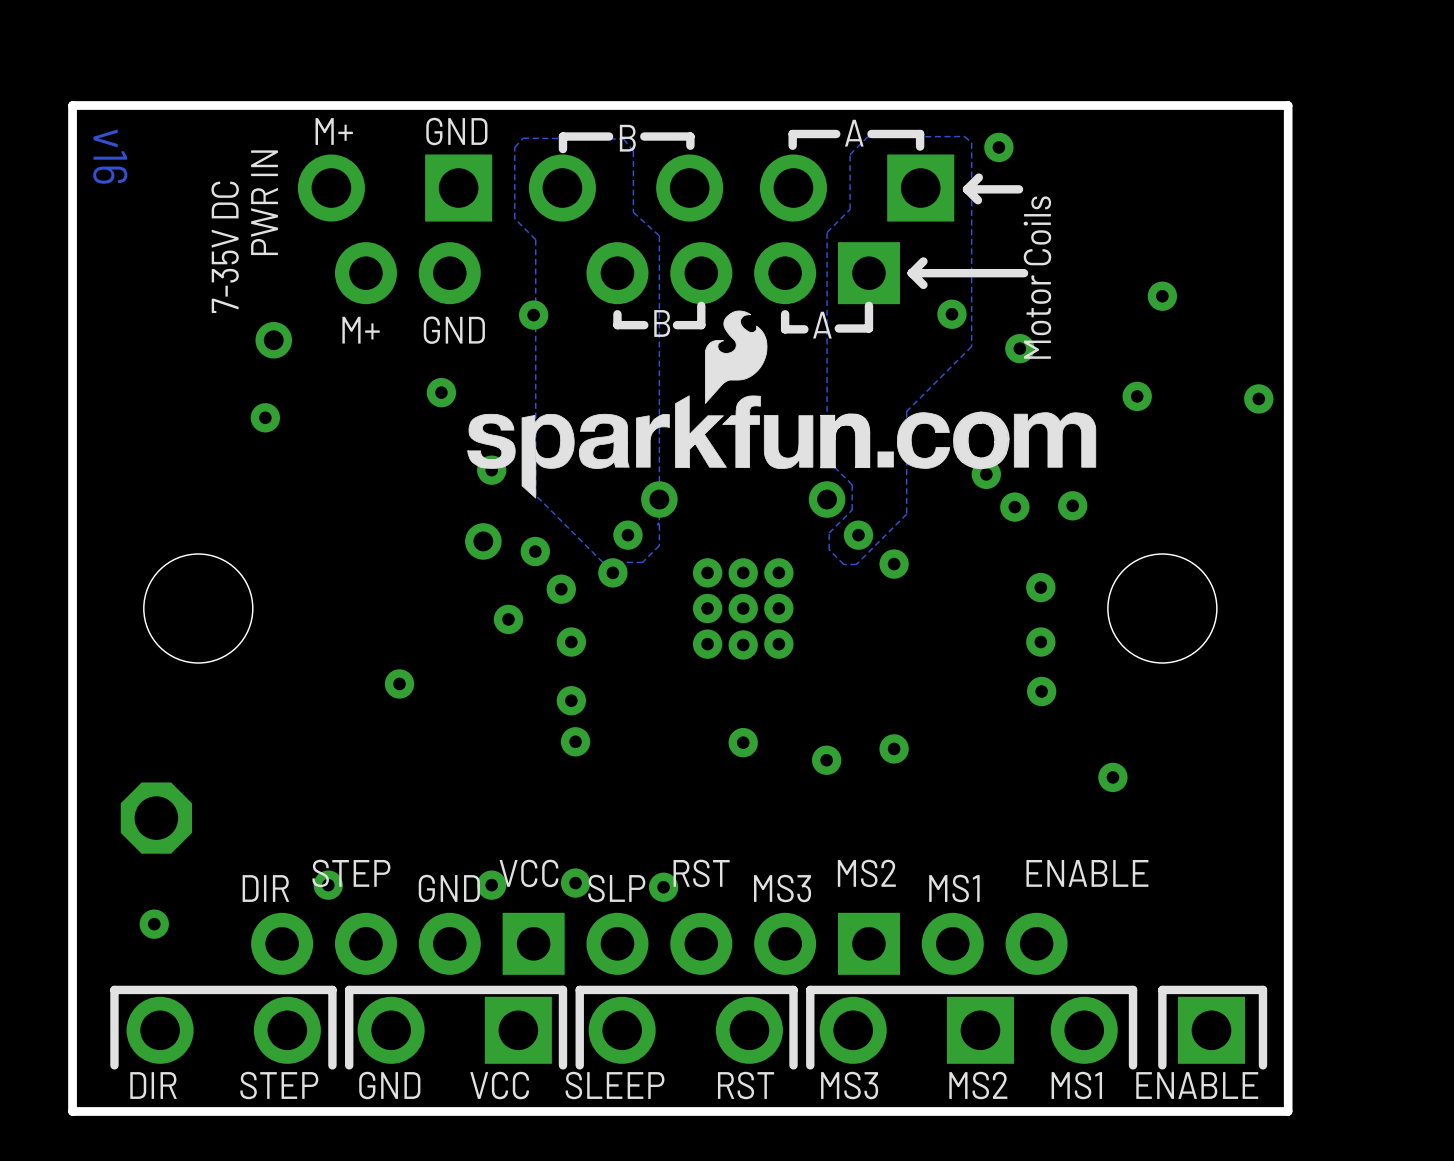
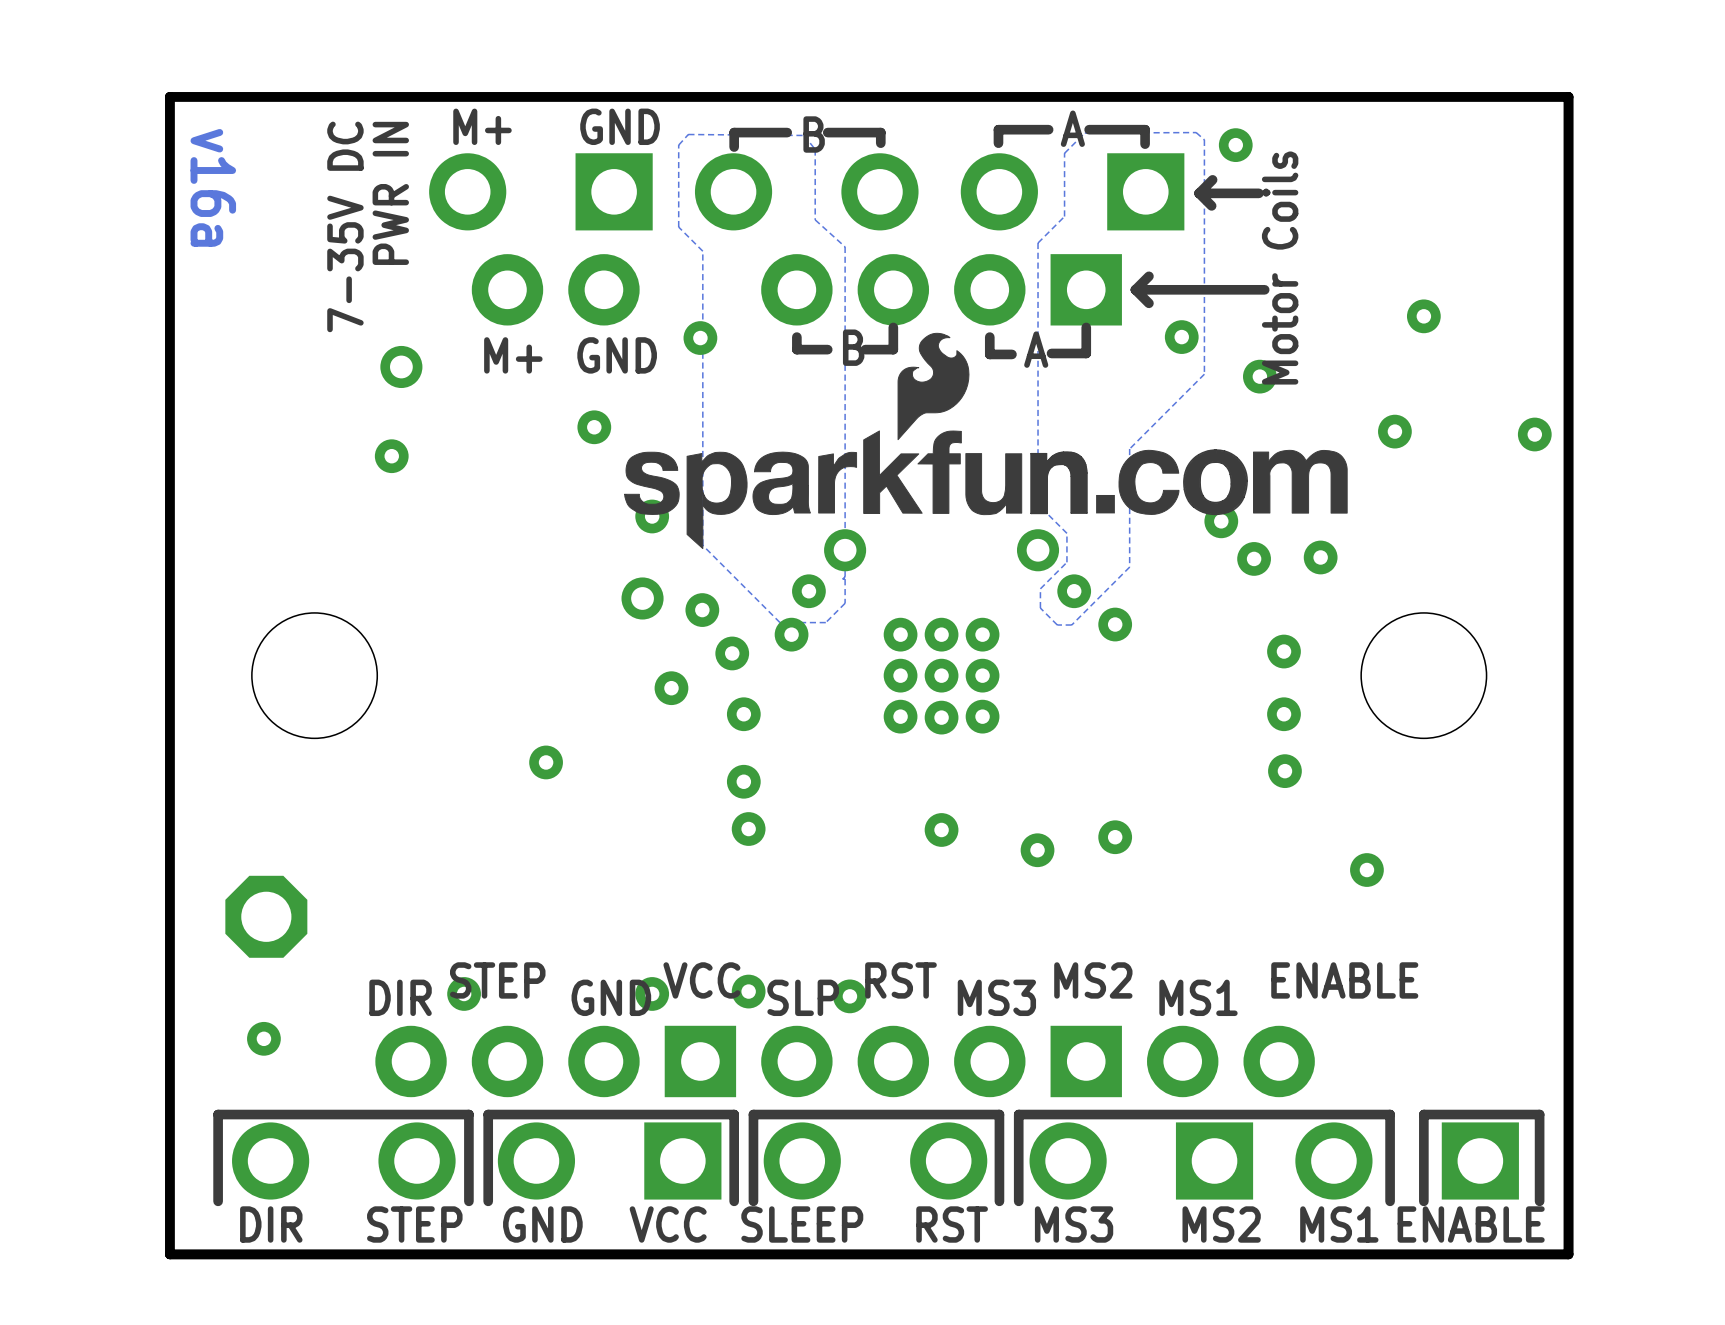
text: v16 (110, 156) -> v16a (213, 187)

